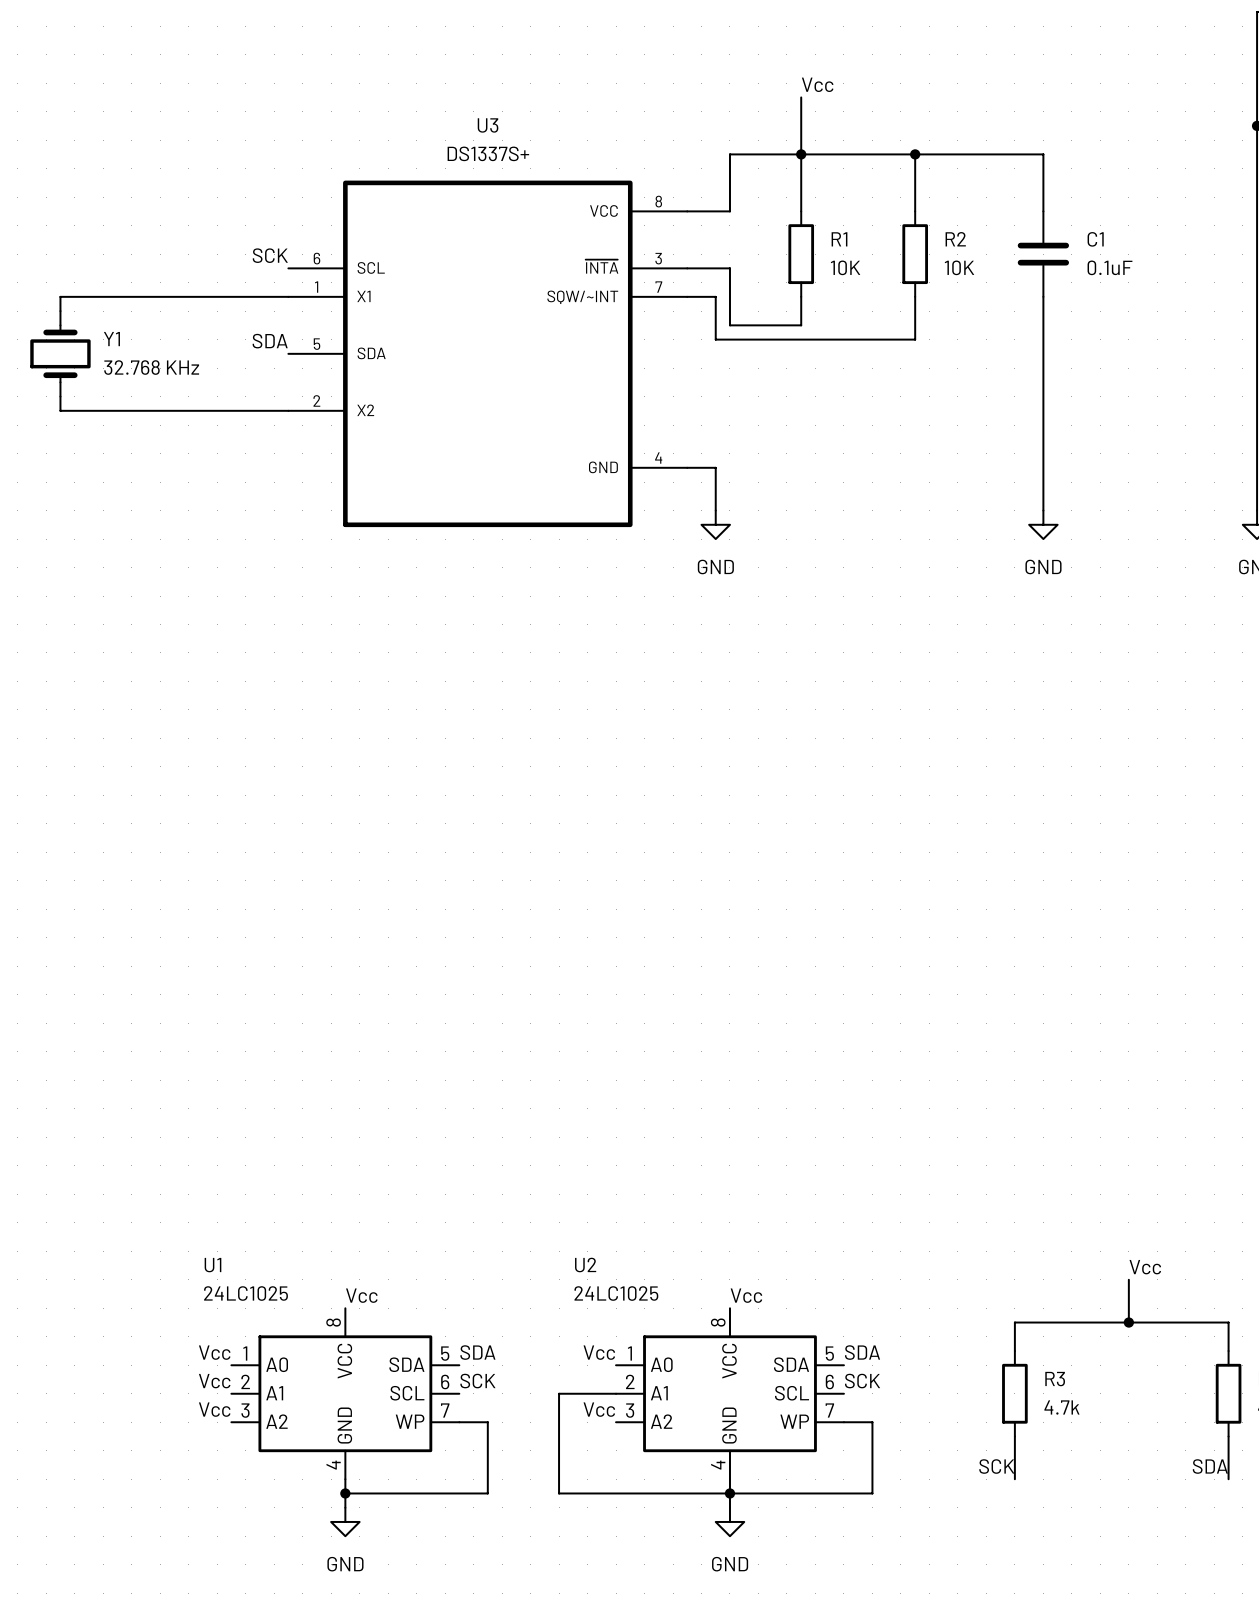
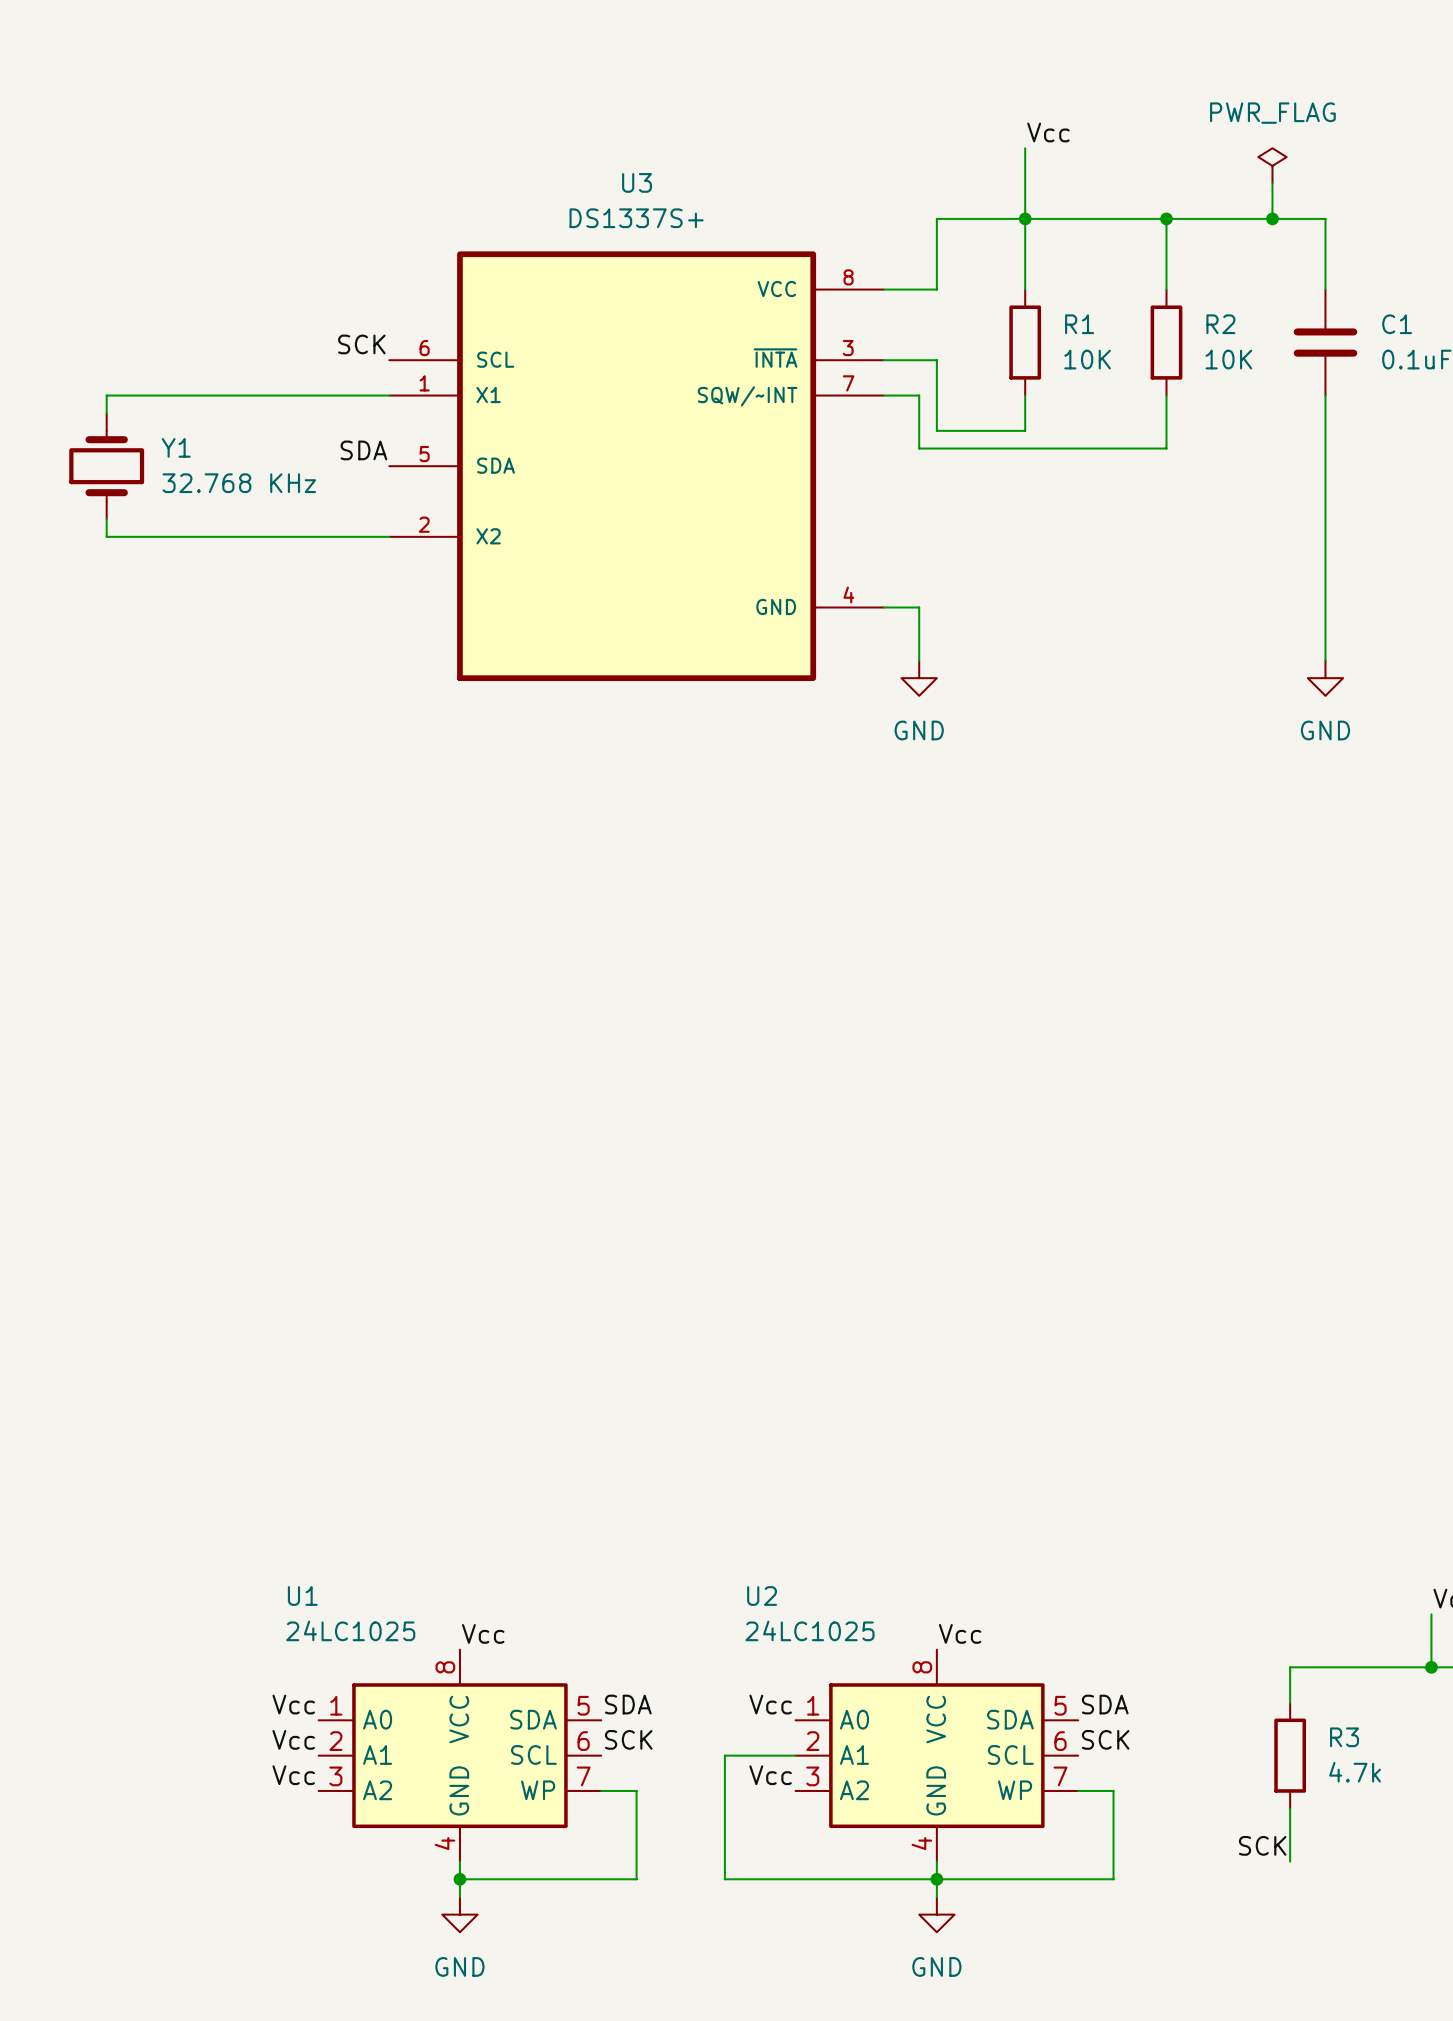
power symbol: none -> PWR_FLAG (1272, 165)
wire: none -> (1272, 183) (1272, 218)
junction: none -> (1272, 218)

